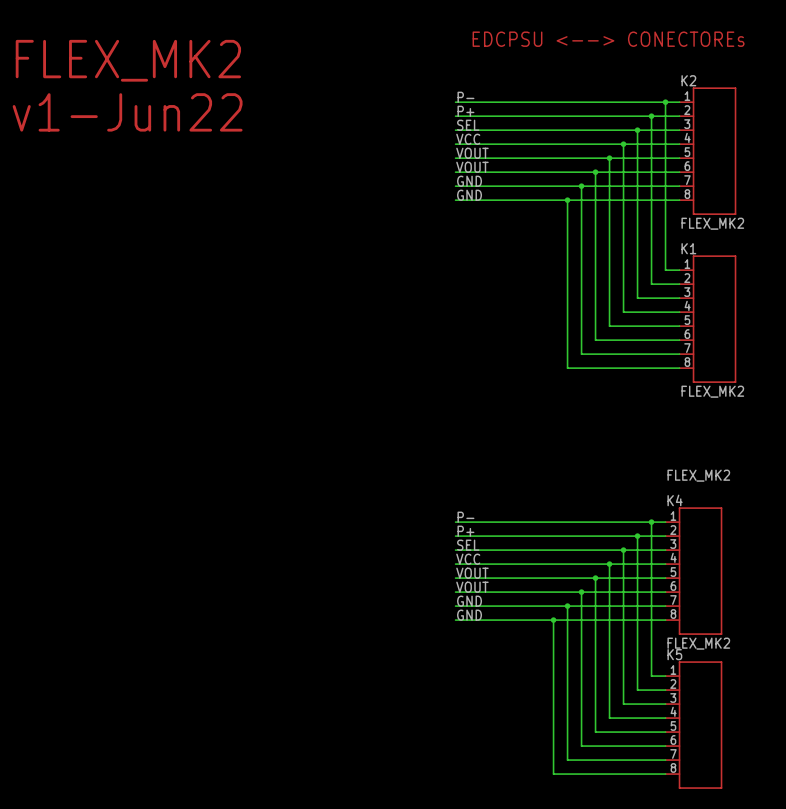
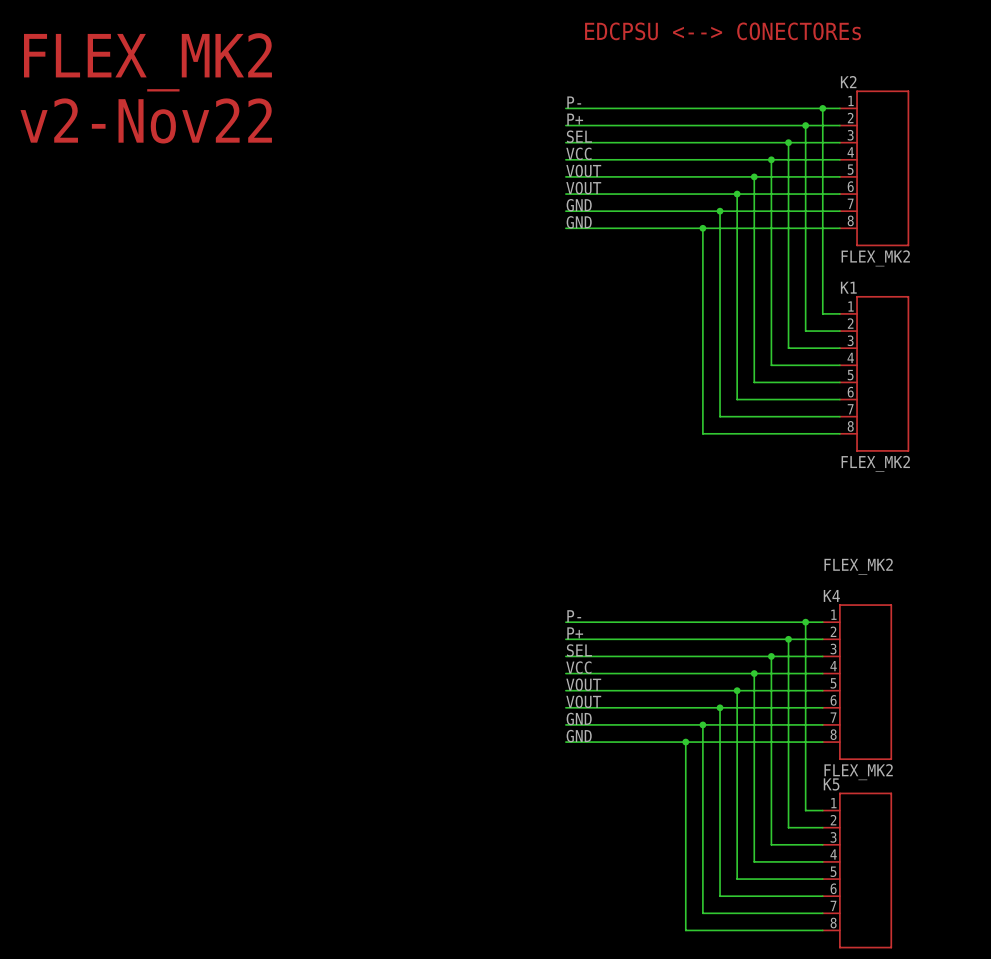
text: v1-Jun22 (127, 112) -> v2-Nov22 (146, 120)

